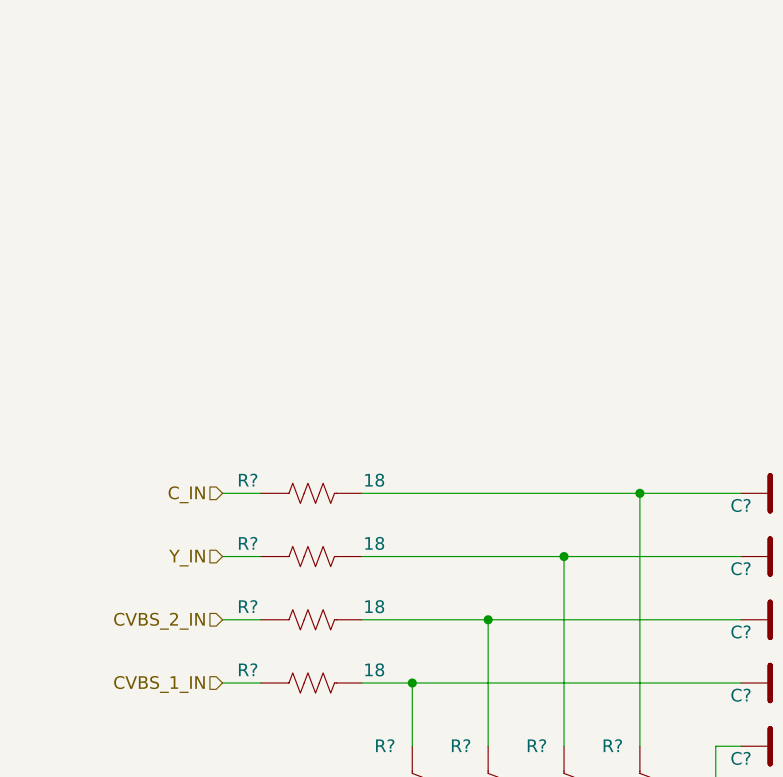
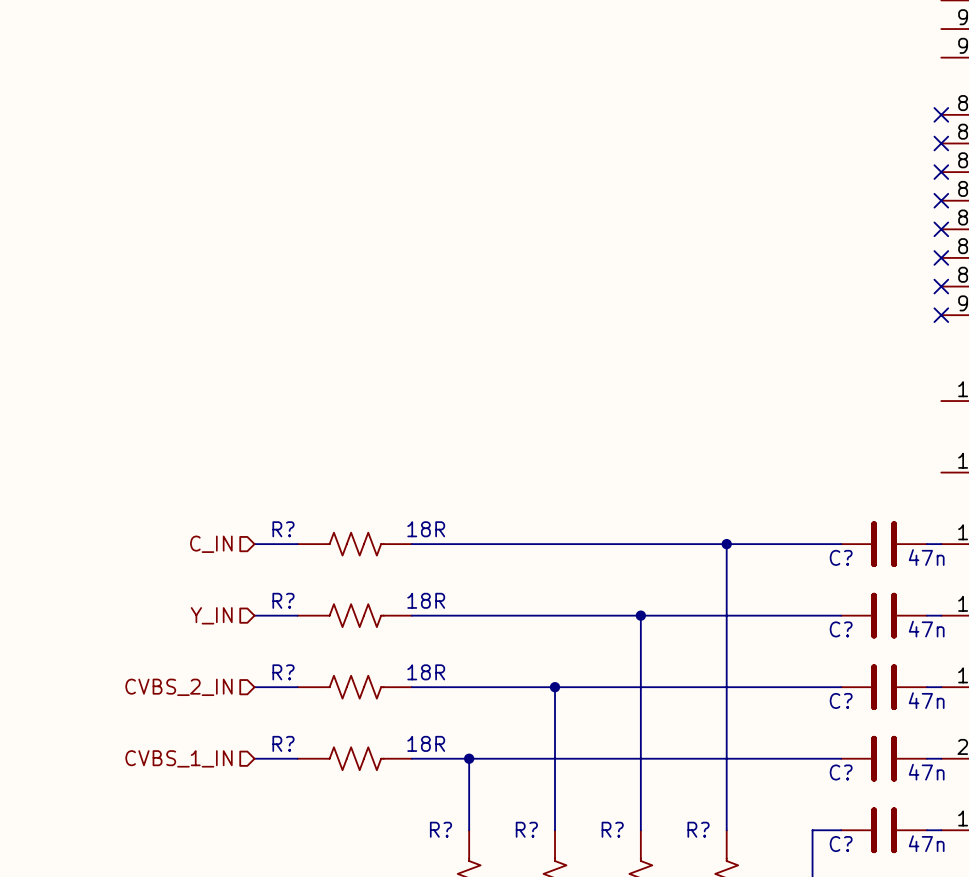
R? value: 18 (374, 480) -> 18R (426, 529)
R? value: 18 (374, 543) -> 18R (426, 600)
R? value: 18 (374, 606) -> 18R (426, 672)
R? value: 18 (374, 669) -> 18R (426, 743)

